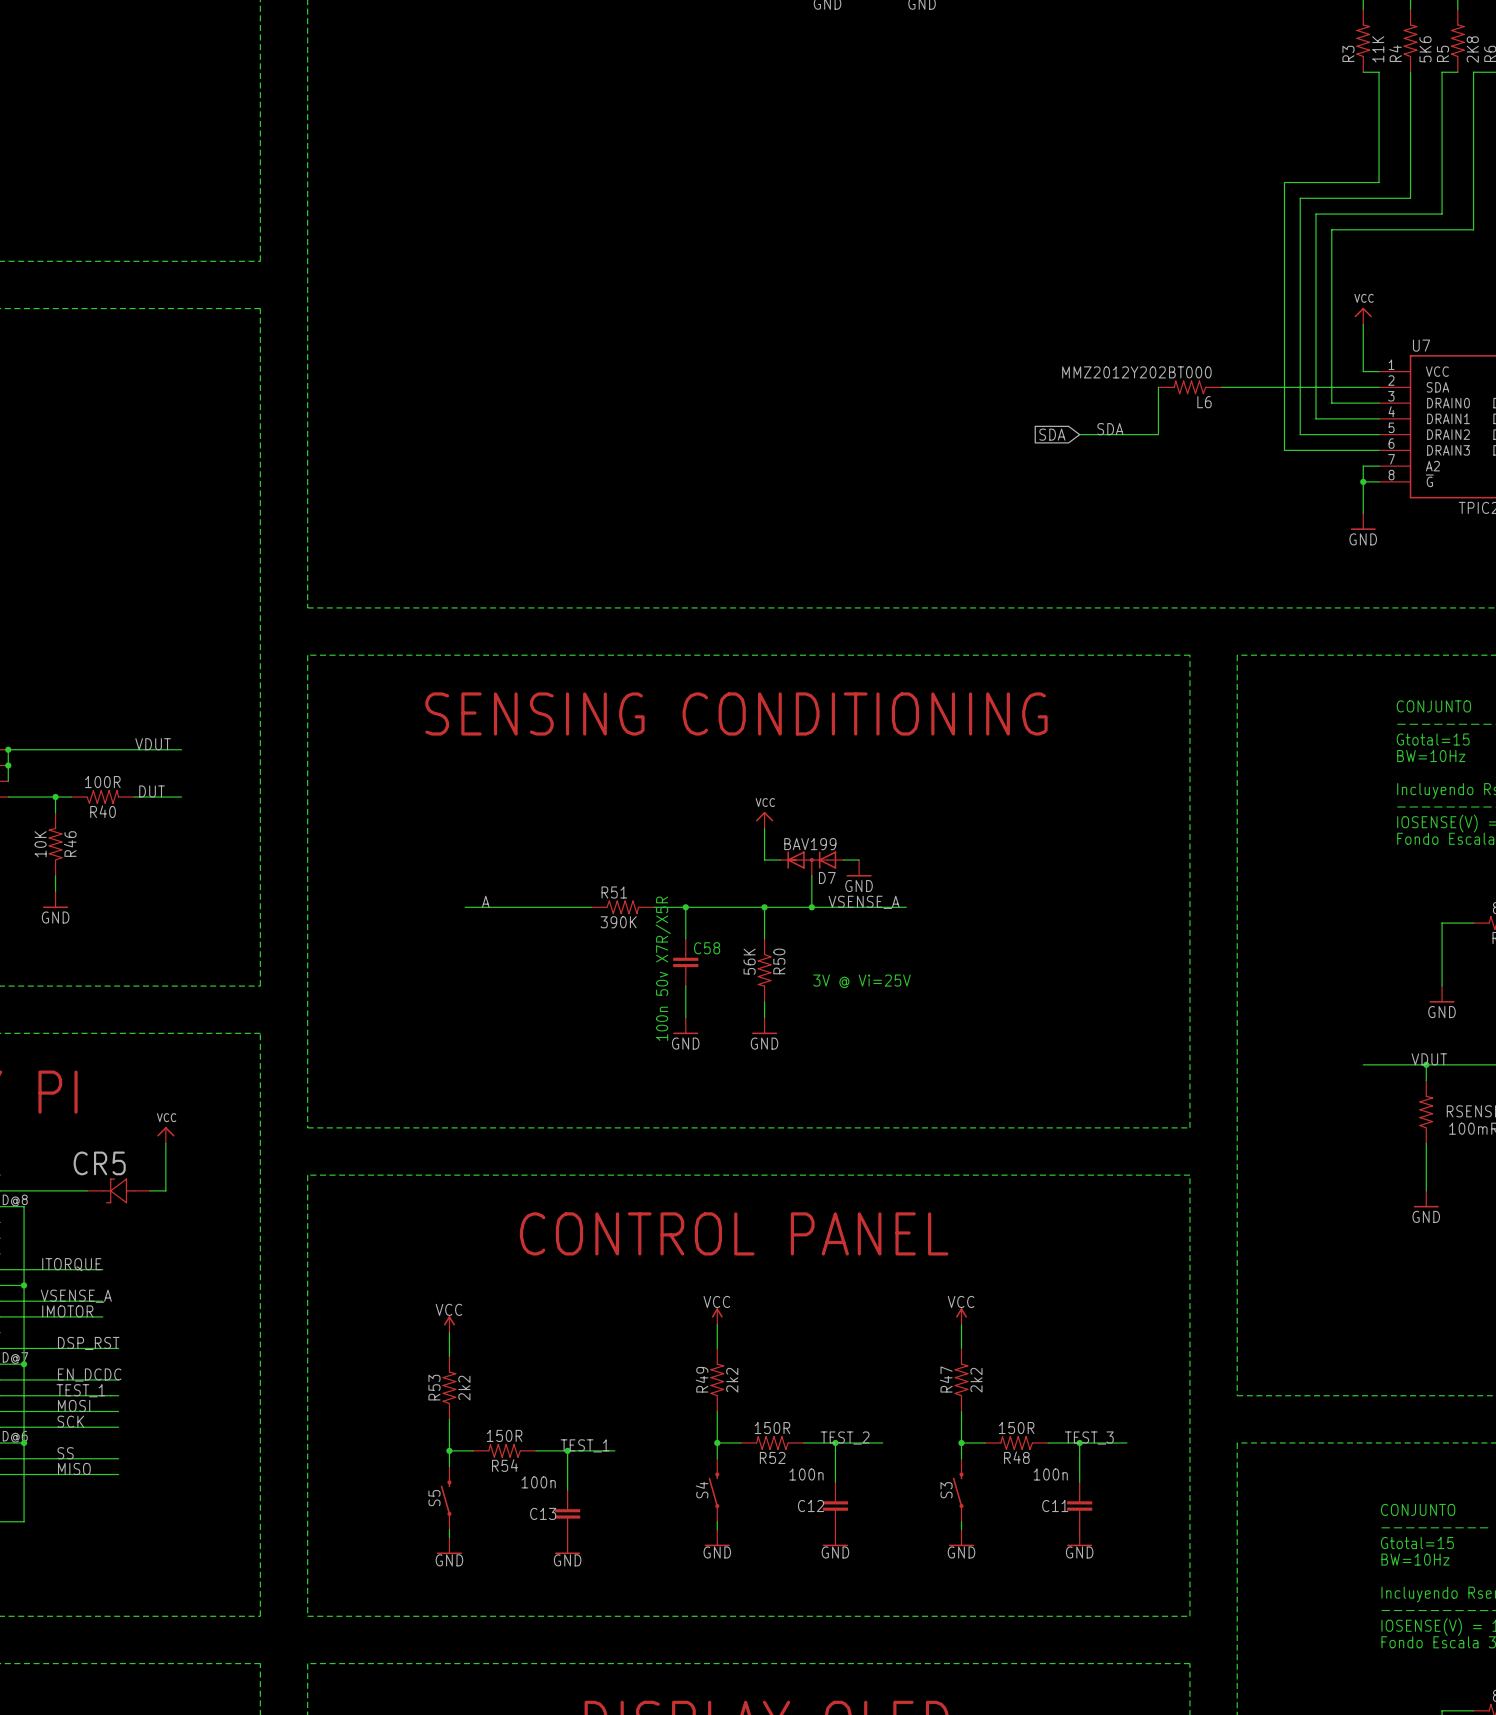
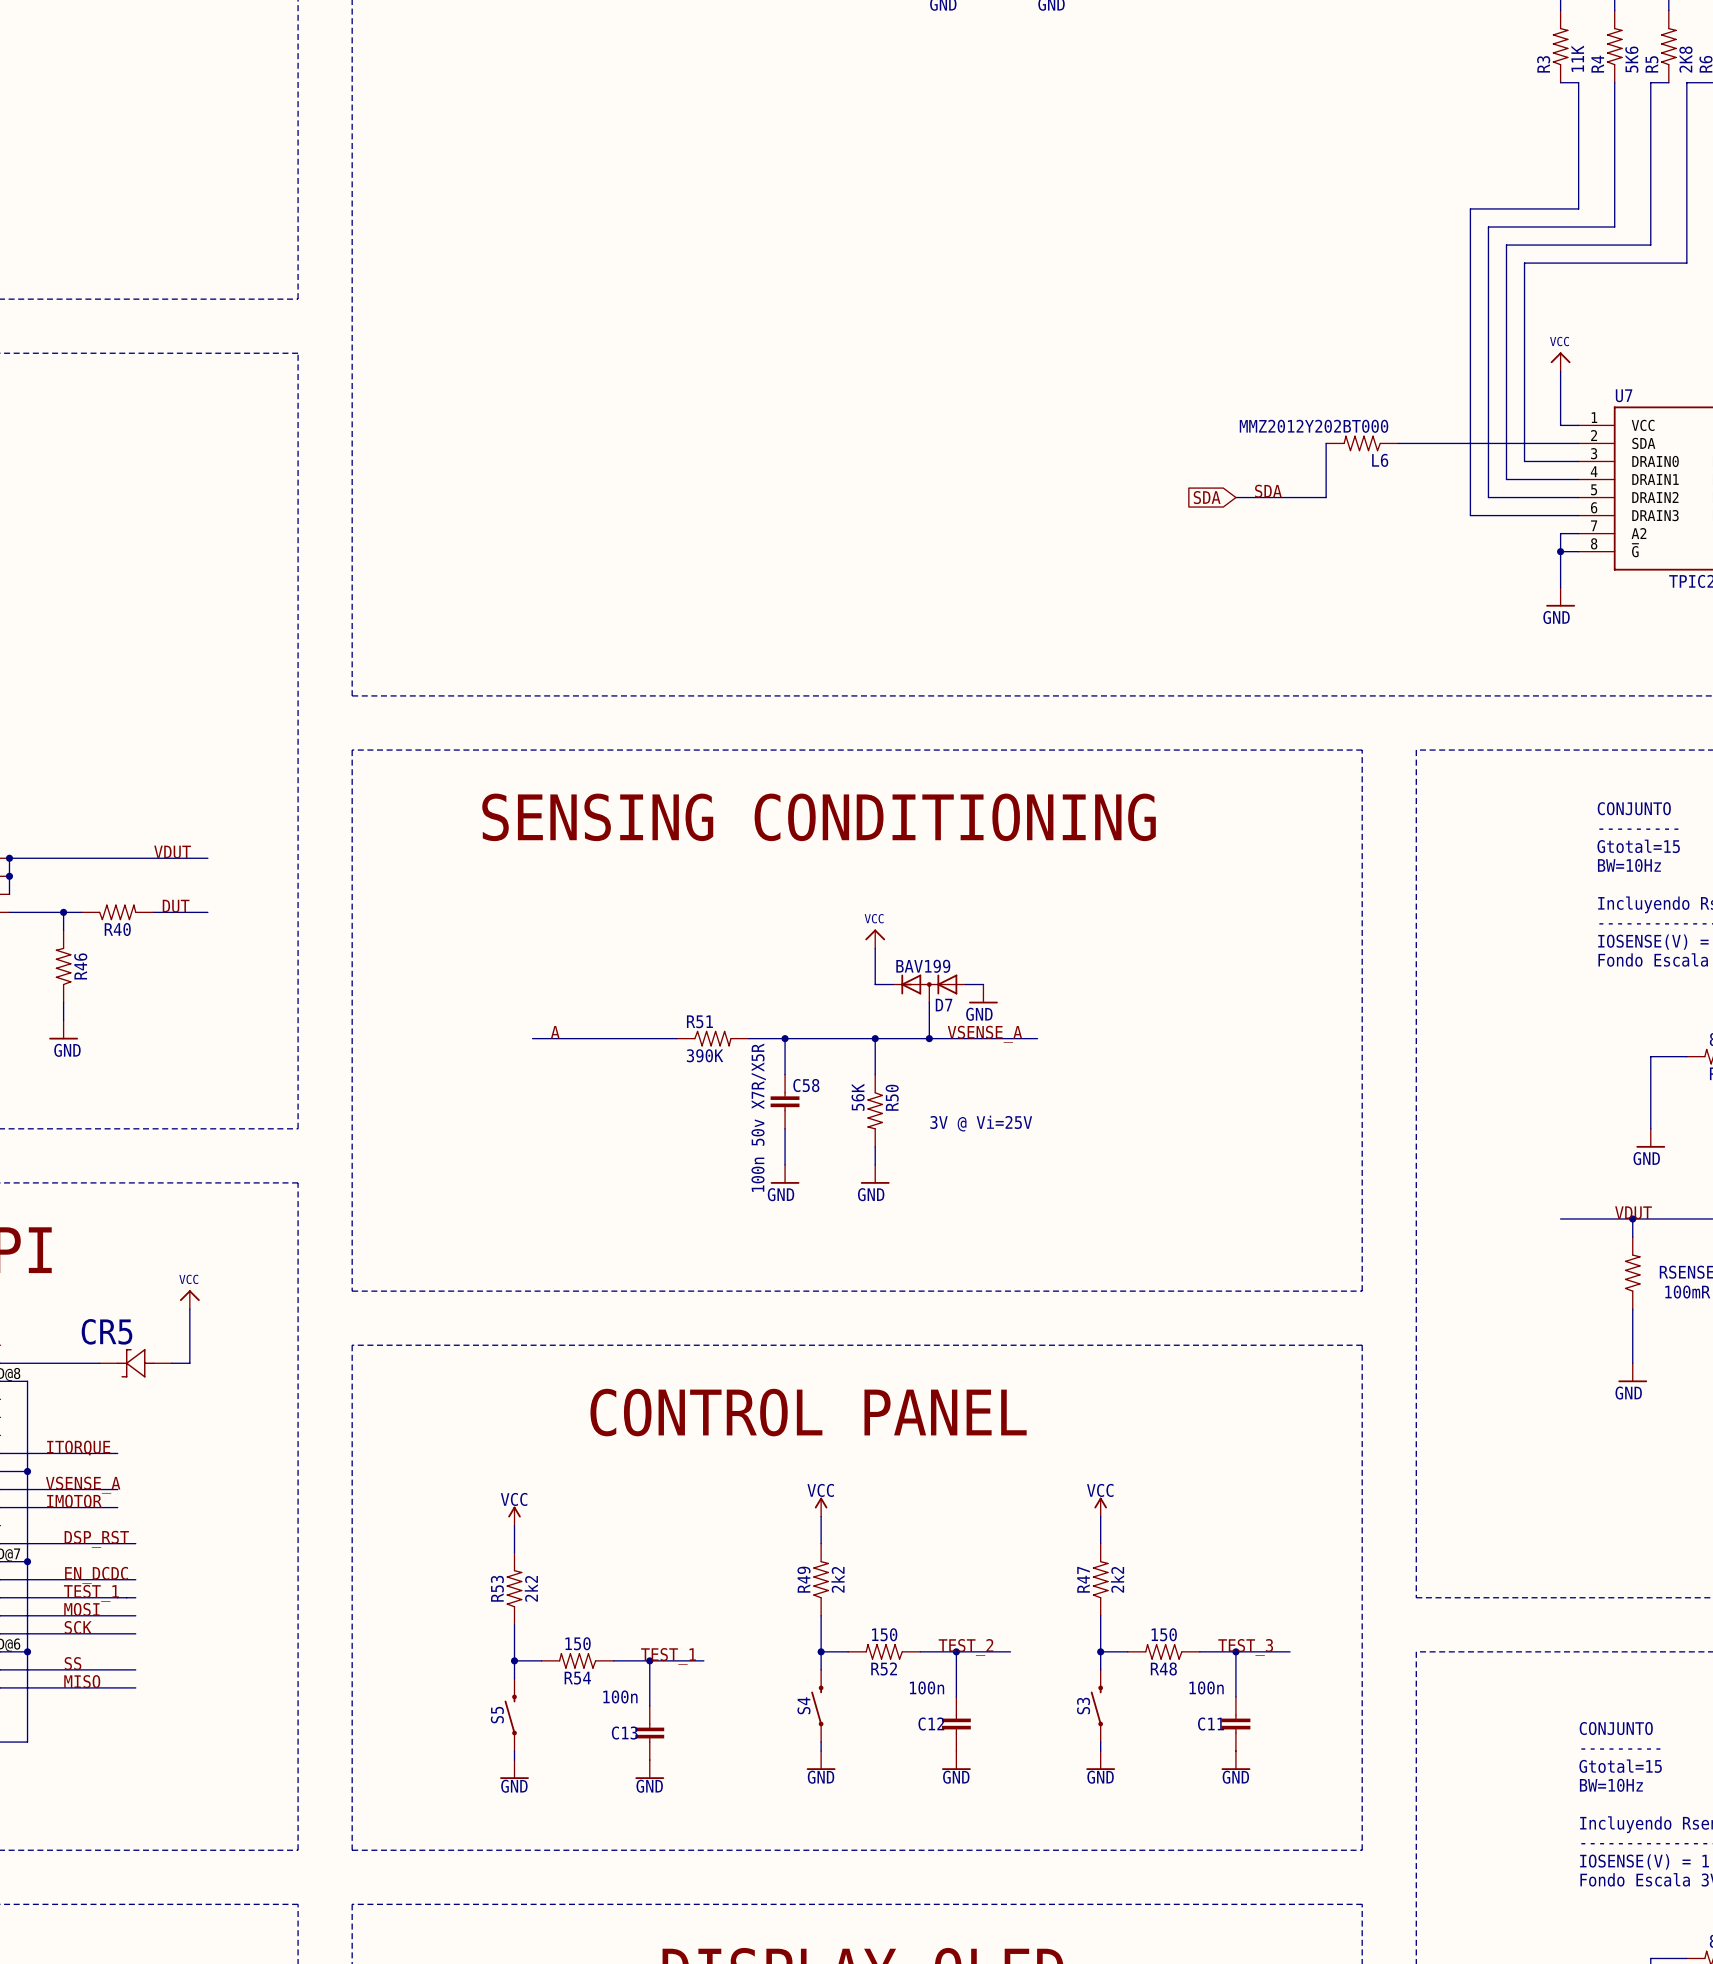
R40 value: 100R (102, 782) -> none
R46 value: 10K (40, 844) -> none
R52 value: 150R (772, 1428) -> 150 (884, 1634)
R48 value: 150R (1016, 1428) -> 150 (1164, 1634)
R54 value: 150R (504, 1435) -> 150 (578, 1643)

